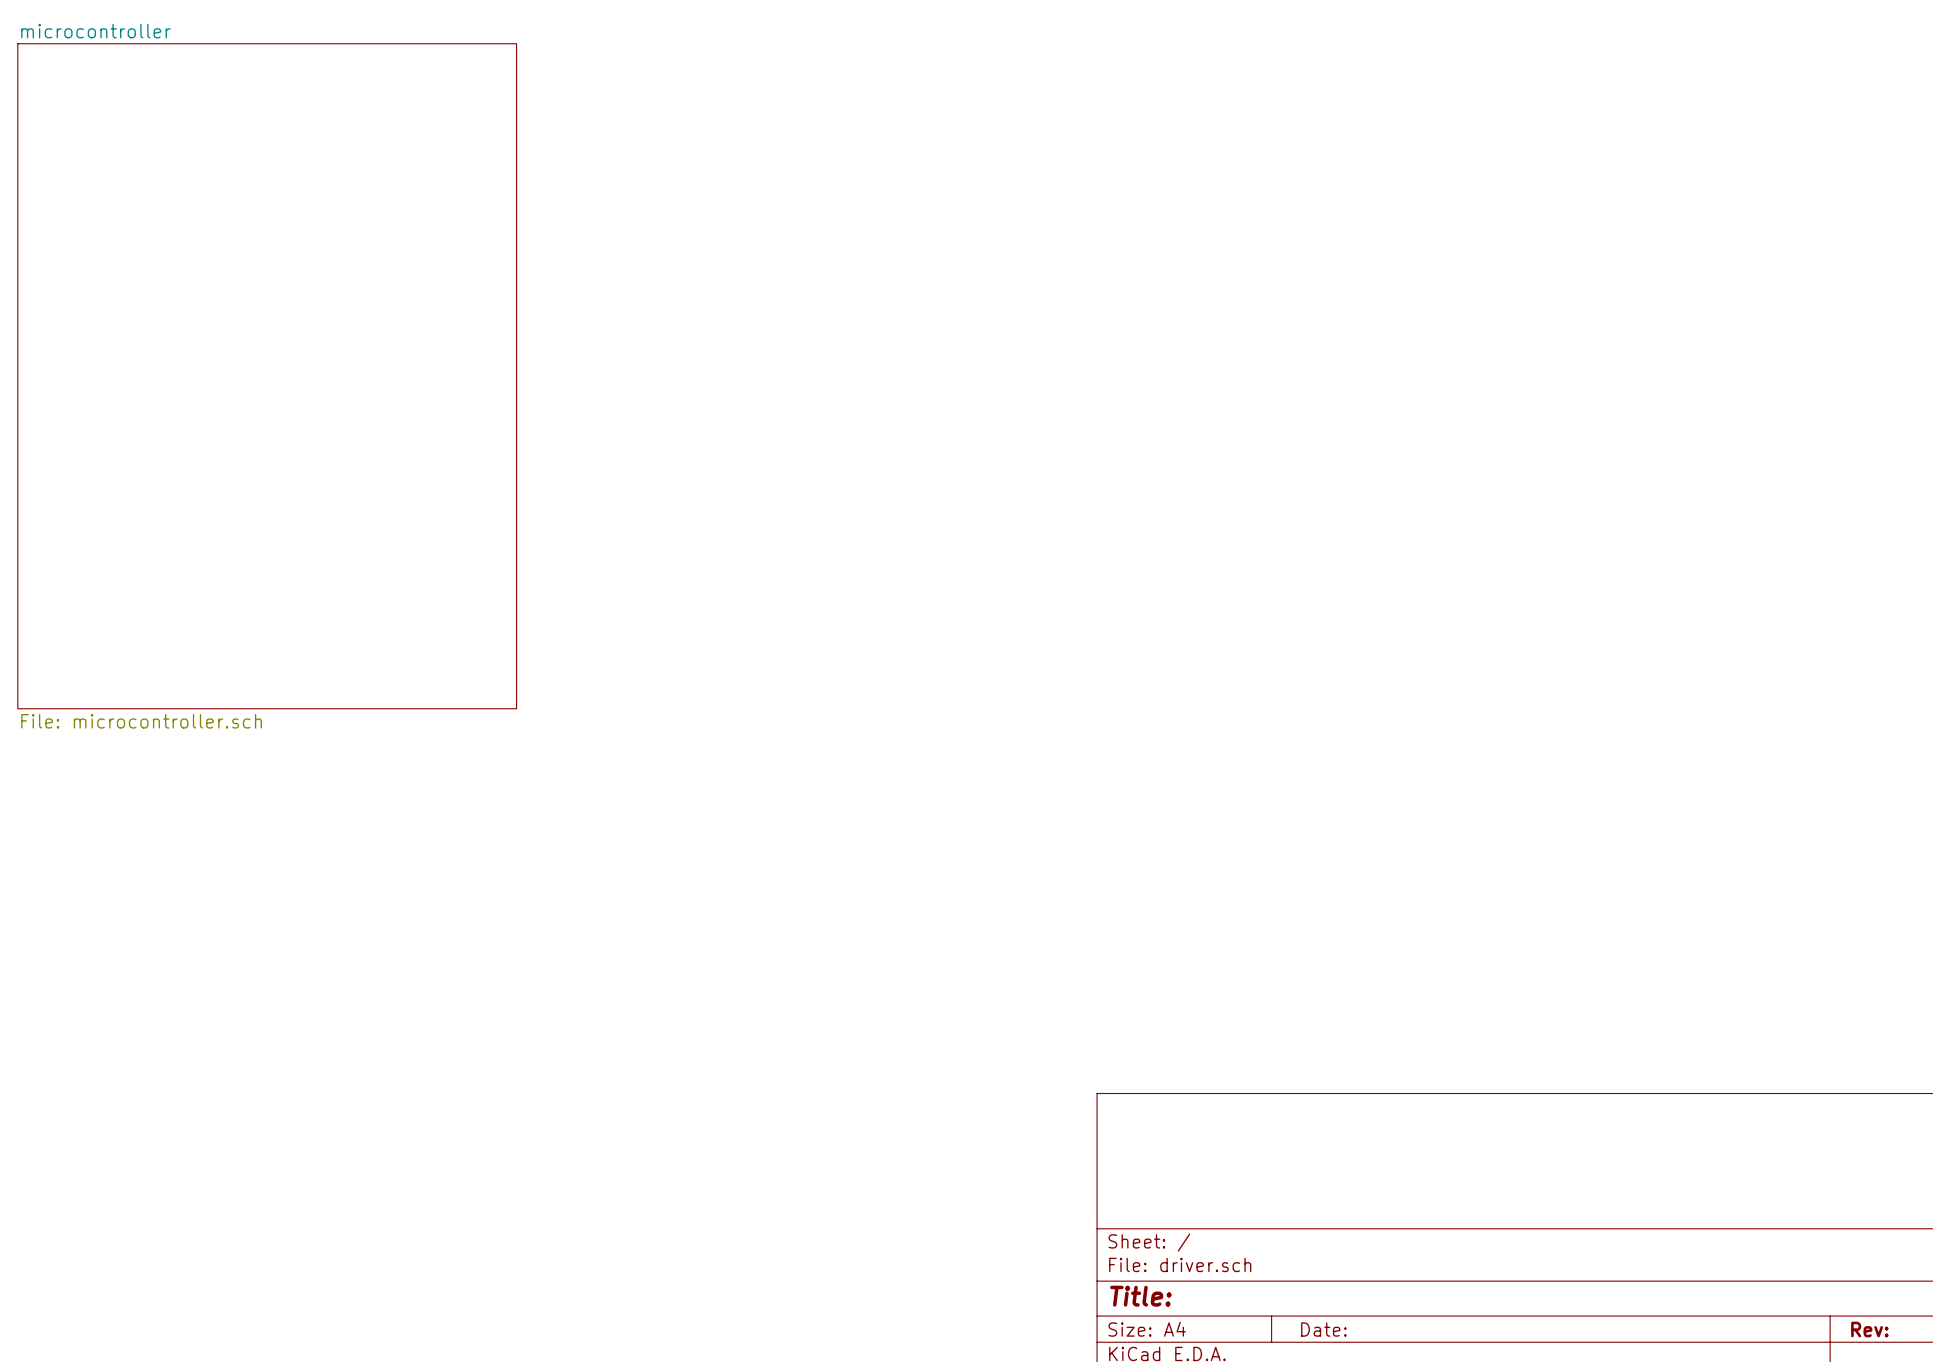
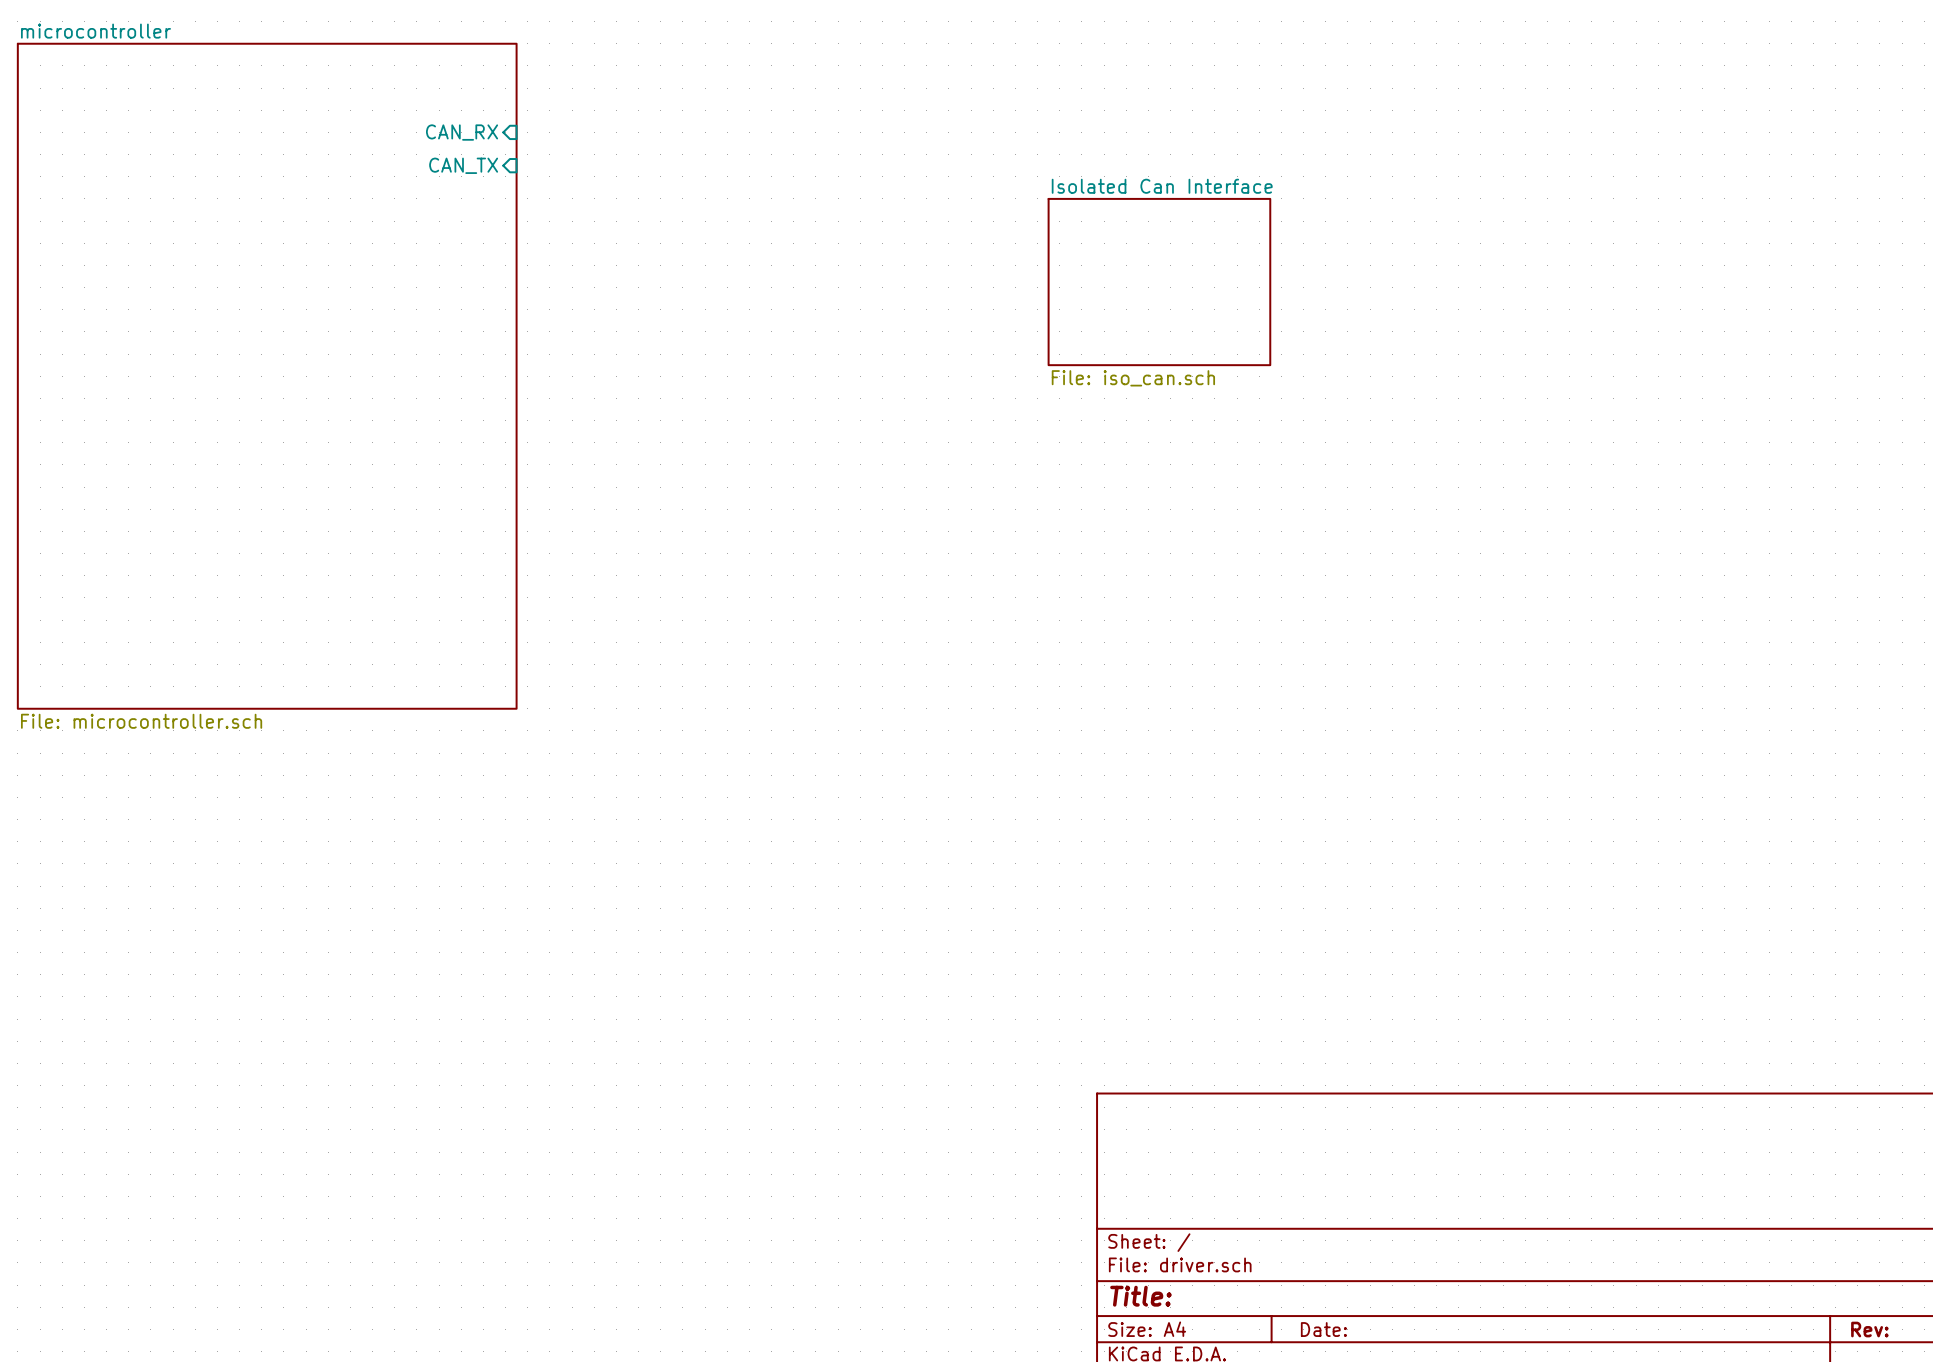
sheet pin: none -> CAN_RX (462, 132)
sheet pin: none -> CAN_TX (463, 165)
sheet Isolated Can Interface: none -> File: iso_can.sch (1159, 282)

